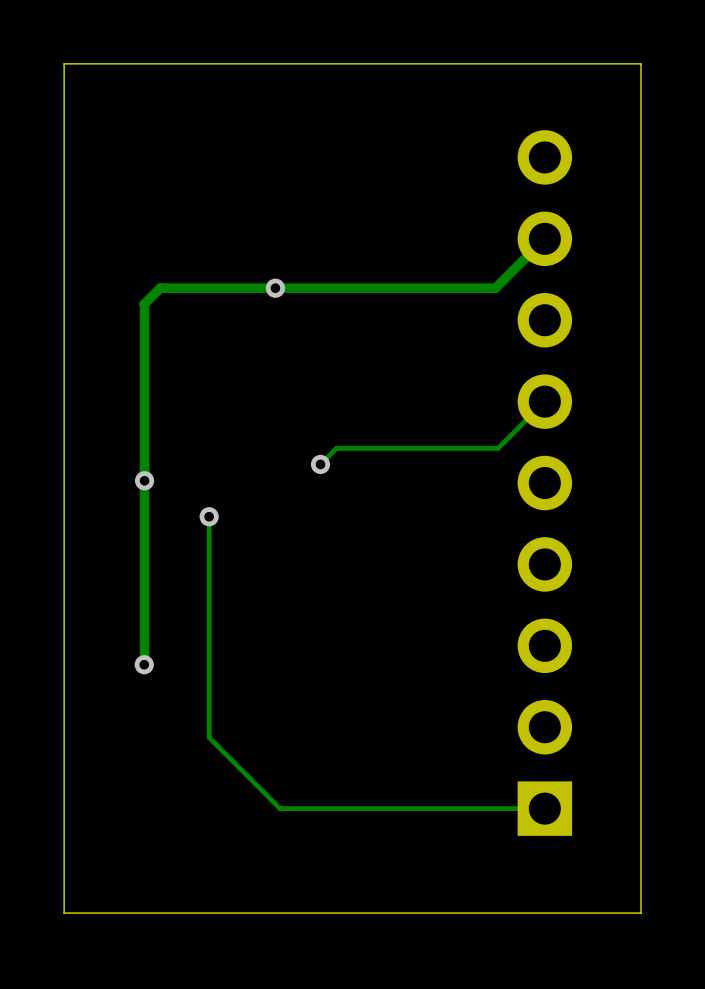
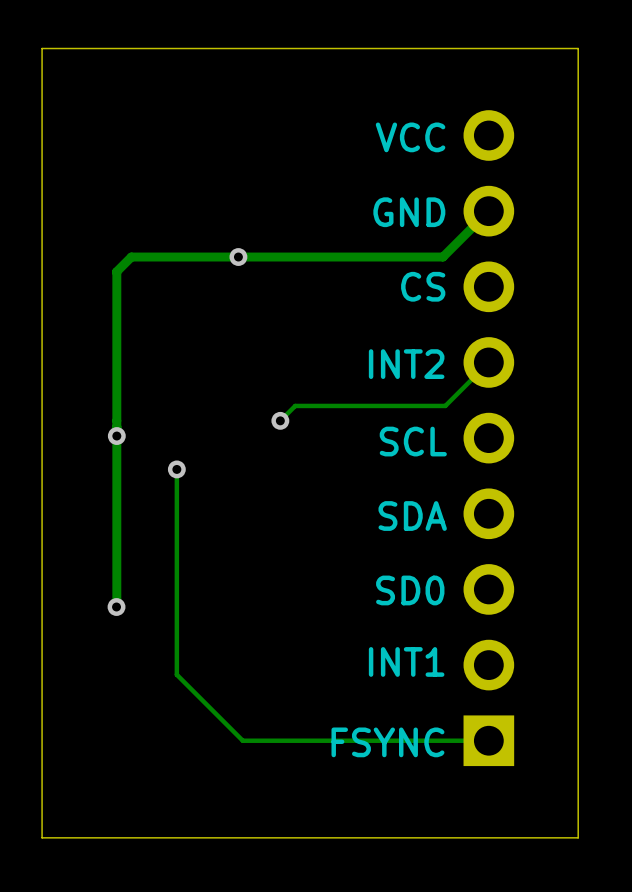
text: none -> VCC (410, 137)
text: none -> GND (409, 212)
text: none -> CS (423, 286)
text: none -> INT2 (406, 364)
text: none -> SCL (413, 441)
text: none -> SDA (412, 516)
text: none -> SD0 (410, 590)
text: none -> INT1 (406, 661)
text: none -> FSYNC (387, 742)

